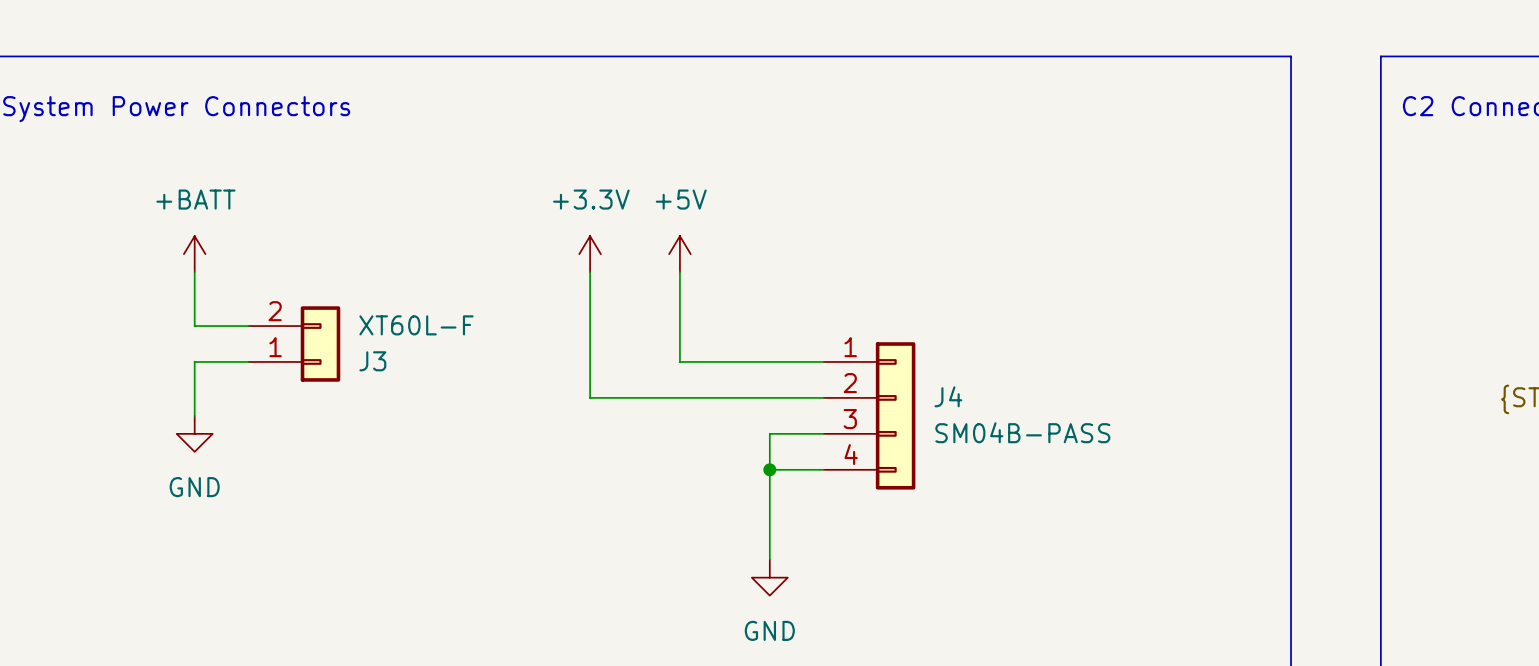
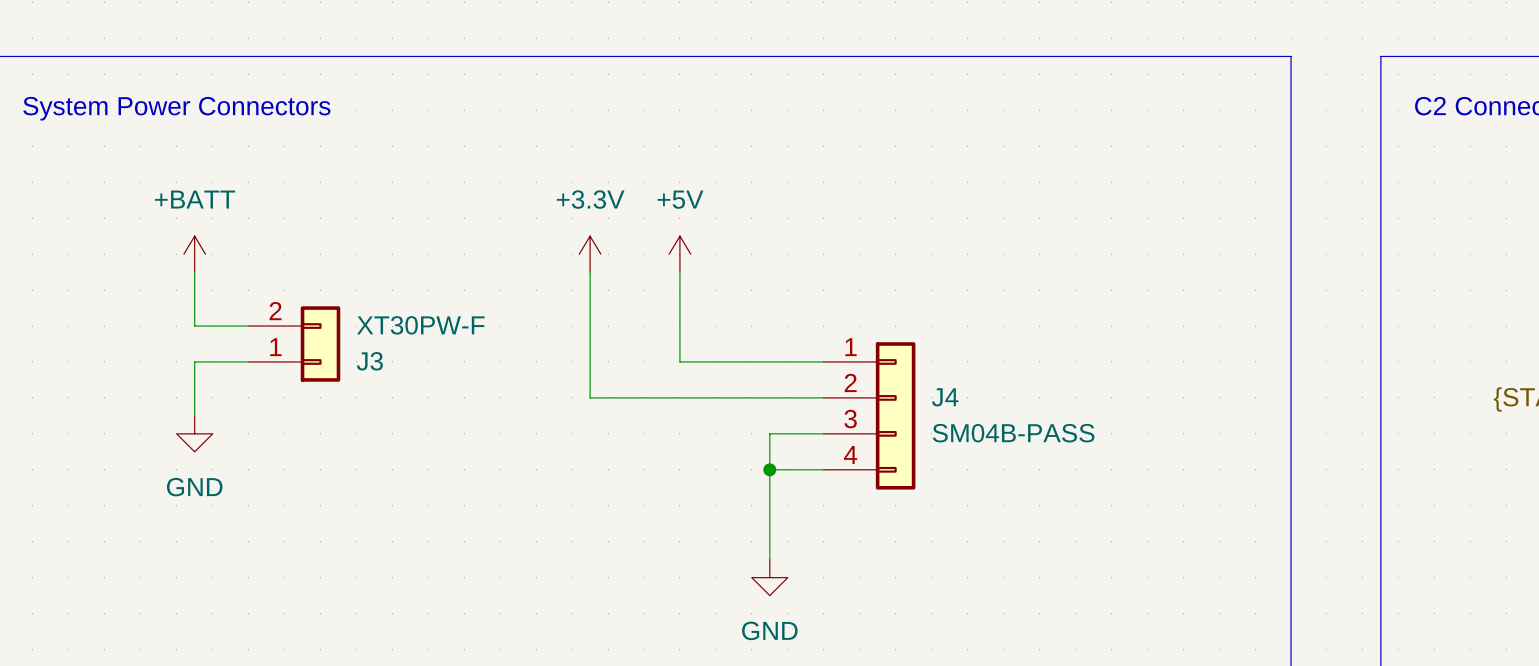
J3 value: XT60L-F (416, 325) -> XT30PW-F (420, 325)

